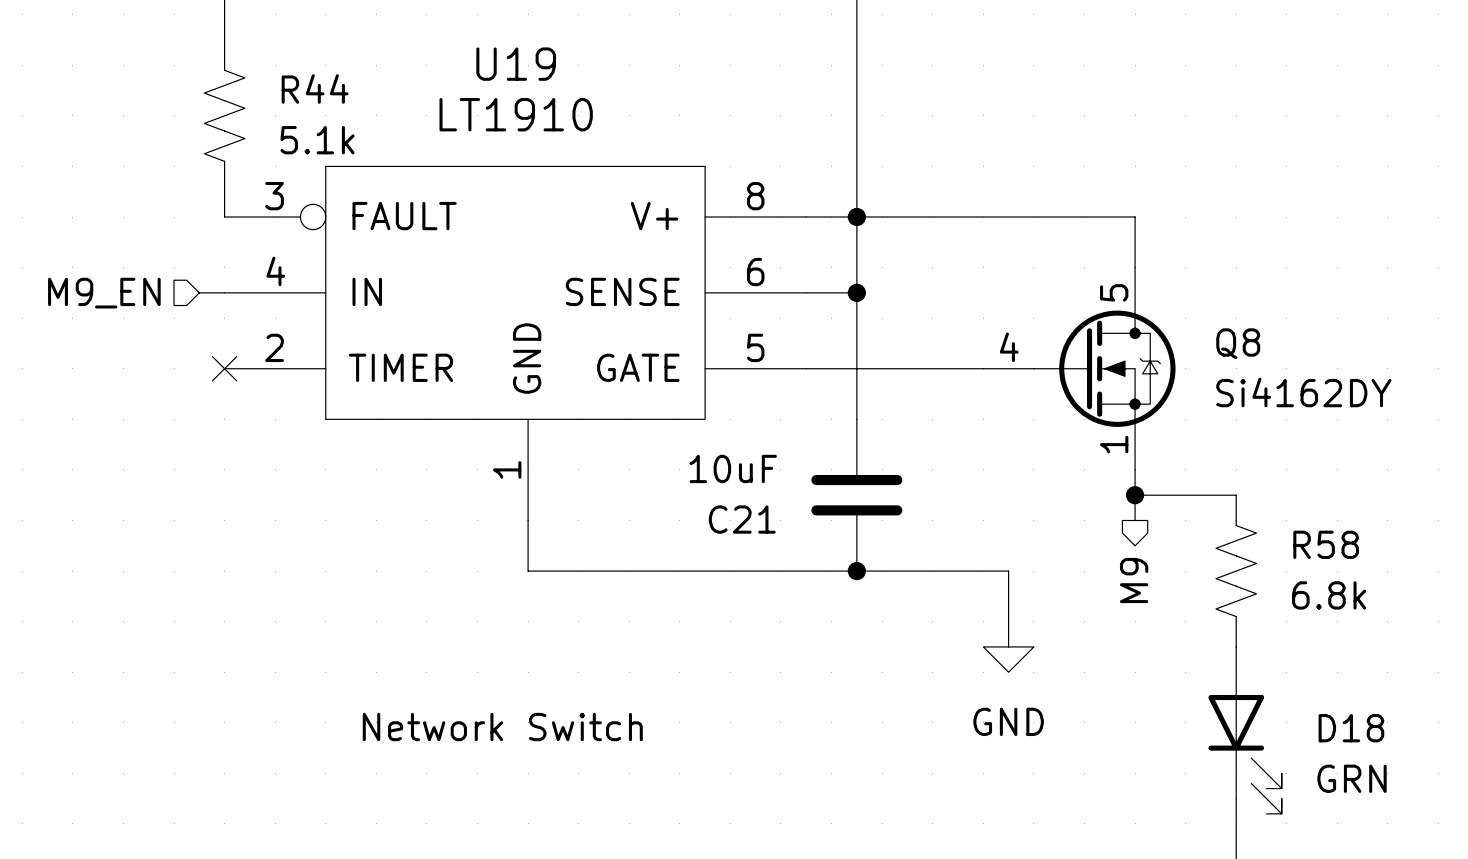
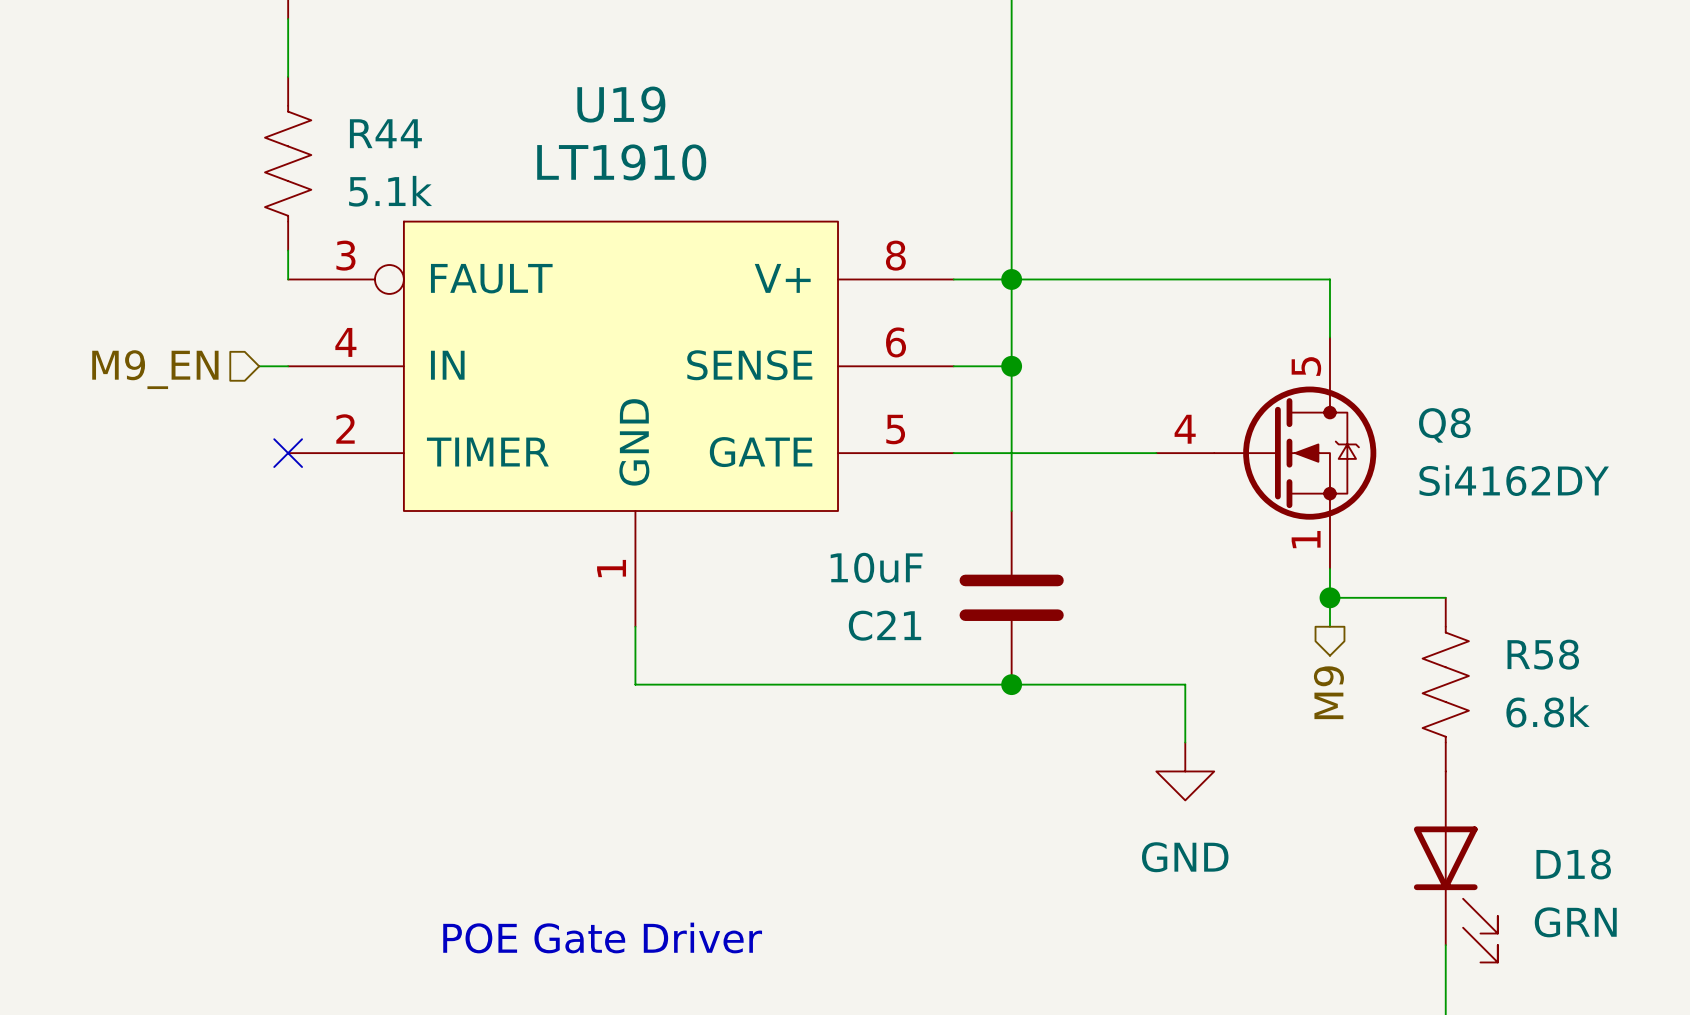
text: Network Switch (502, 727) -> none
text: none -> POE Gate Driver (602, 937)

